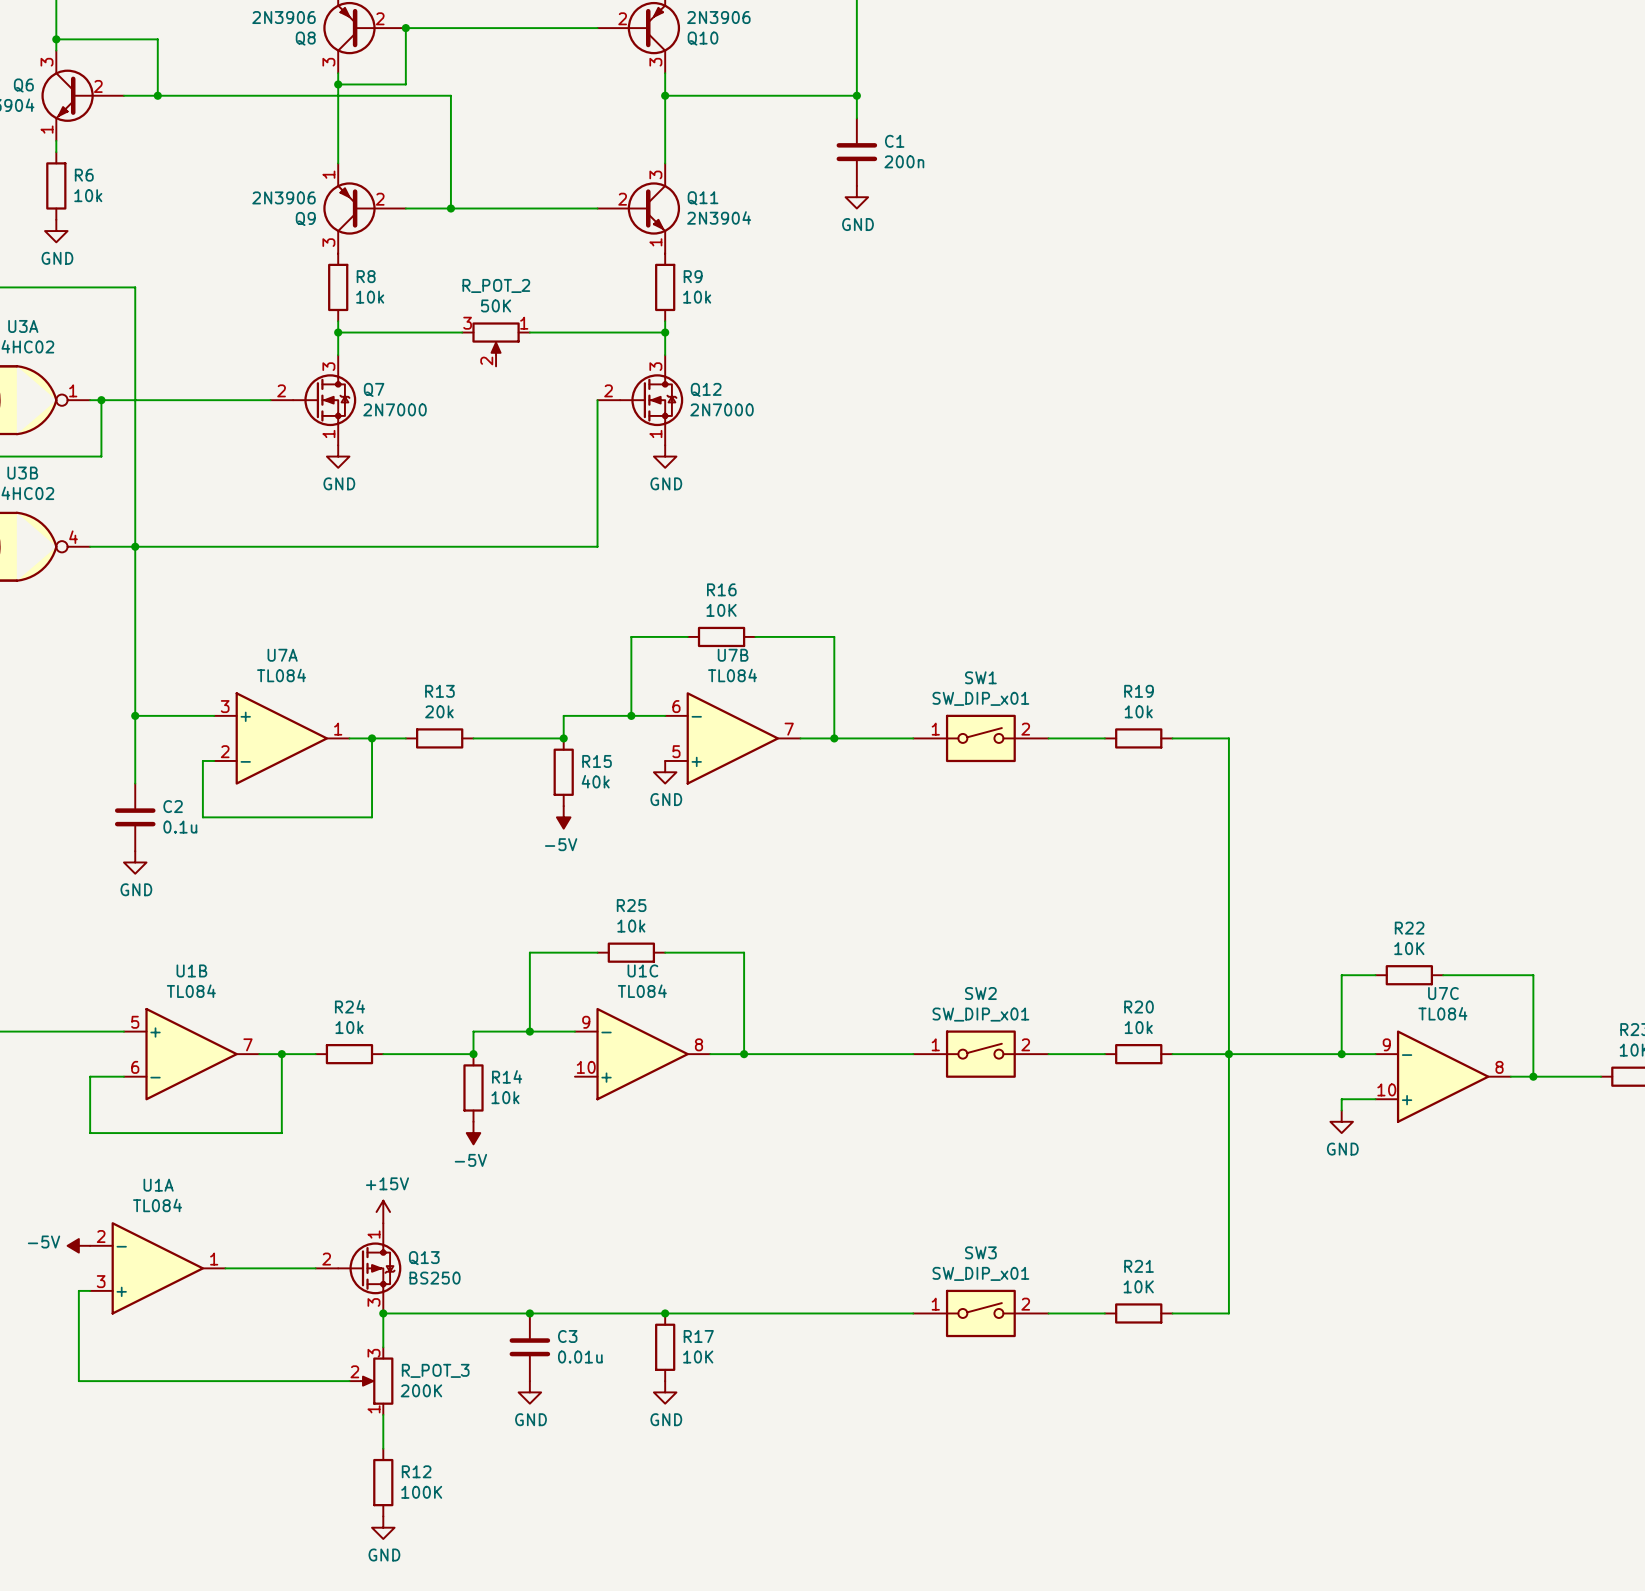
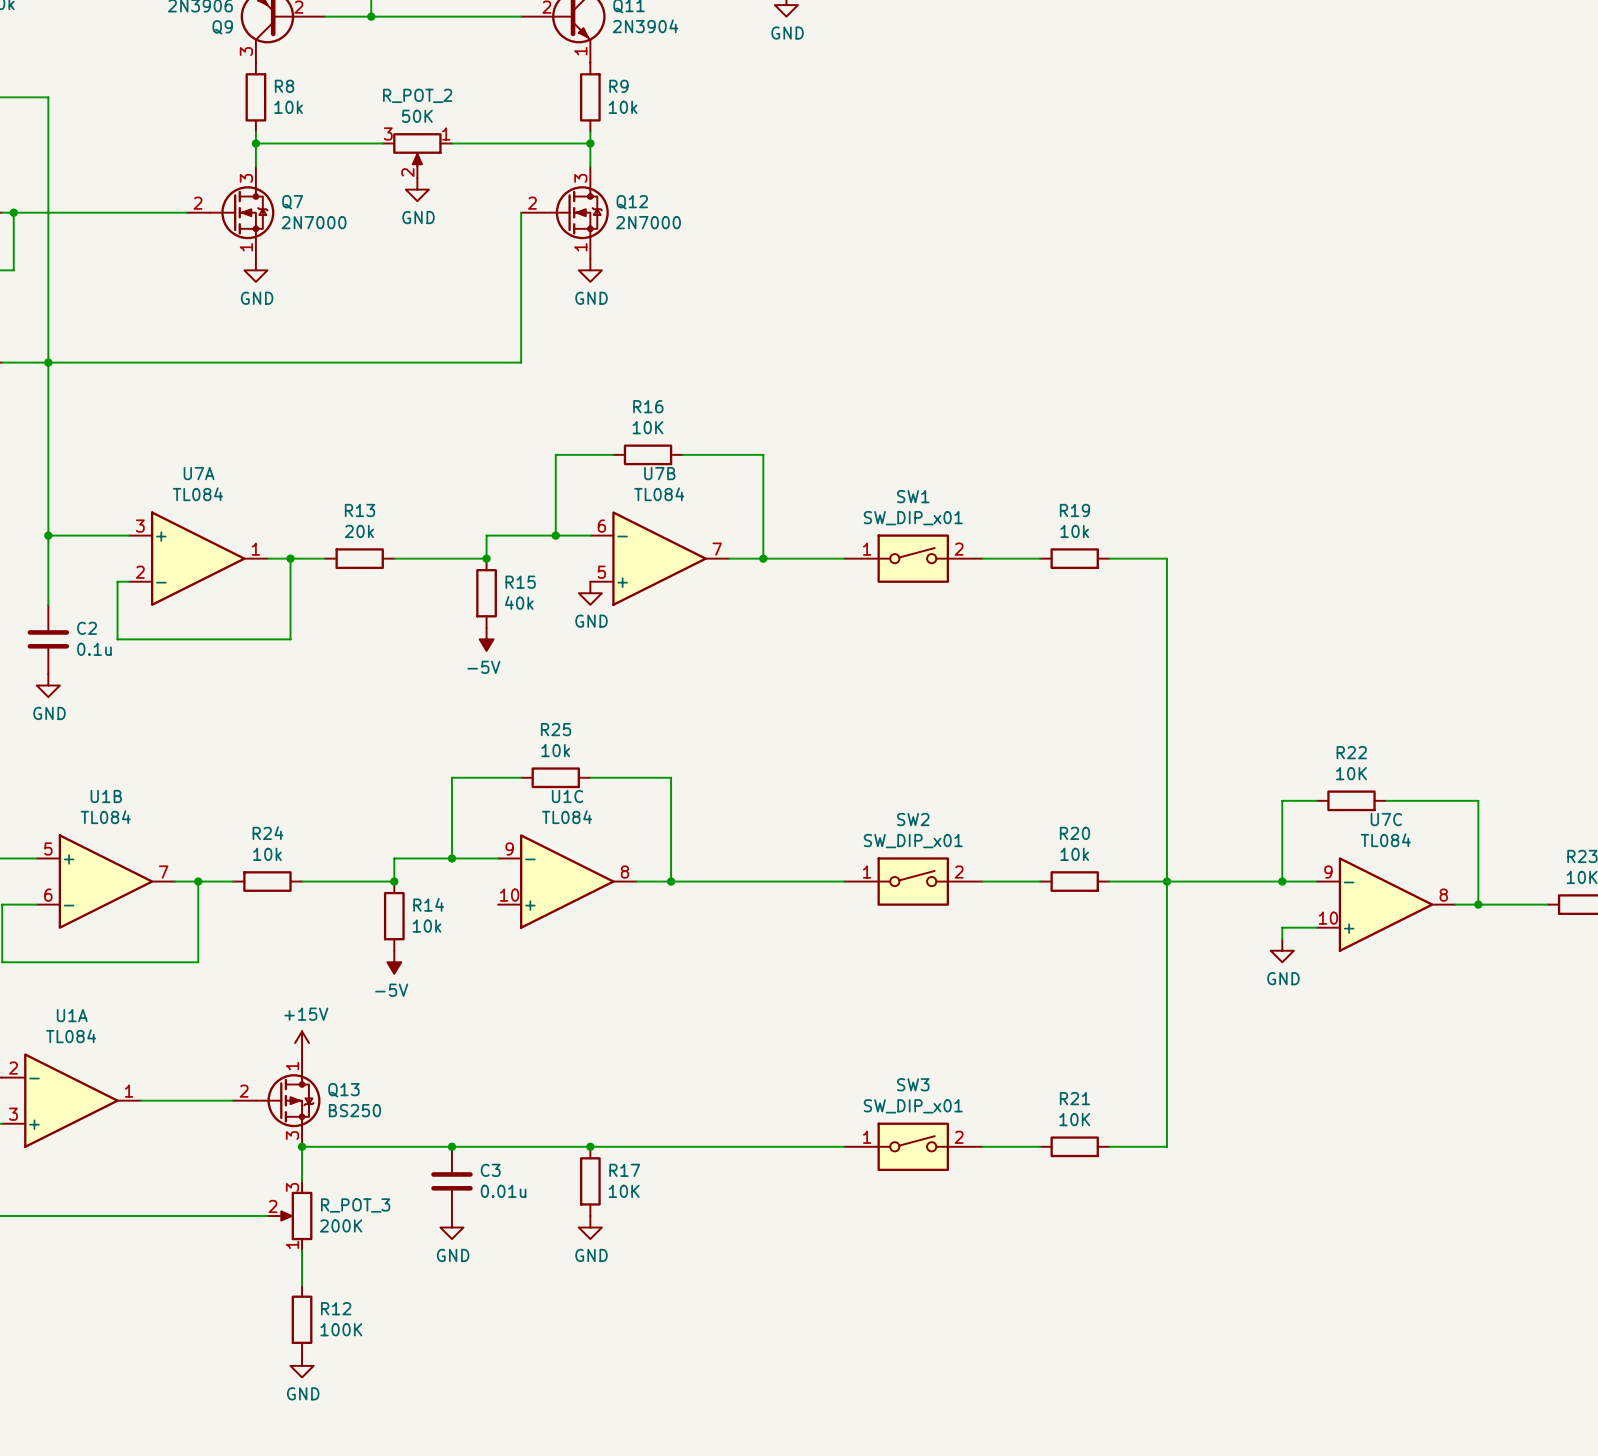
power symbol: none -> GND (417, 189)

